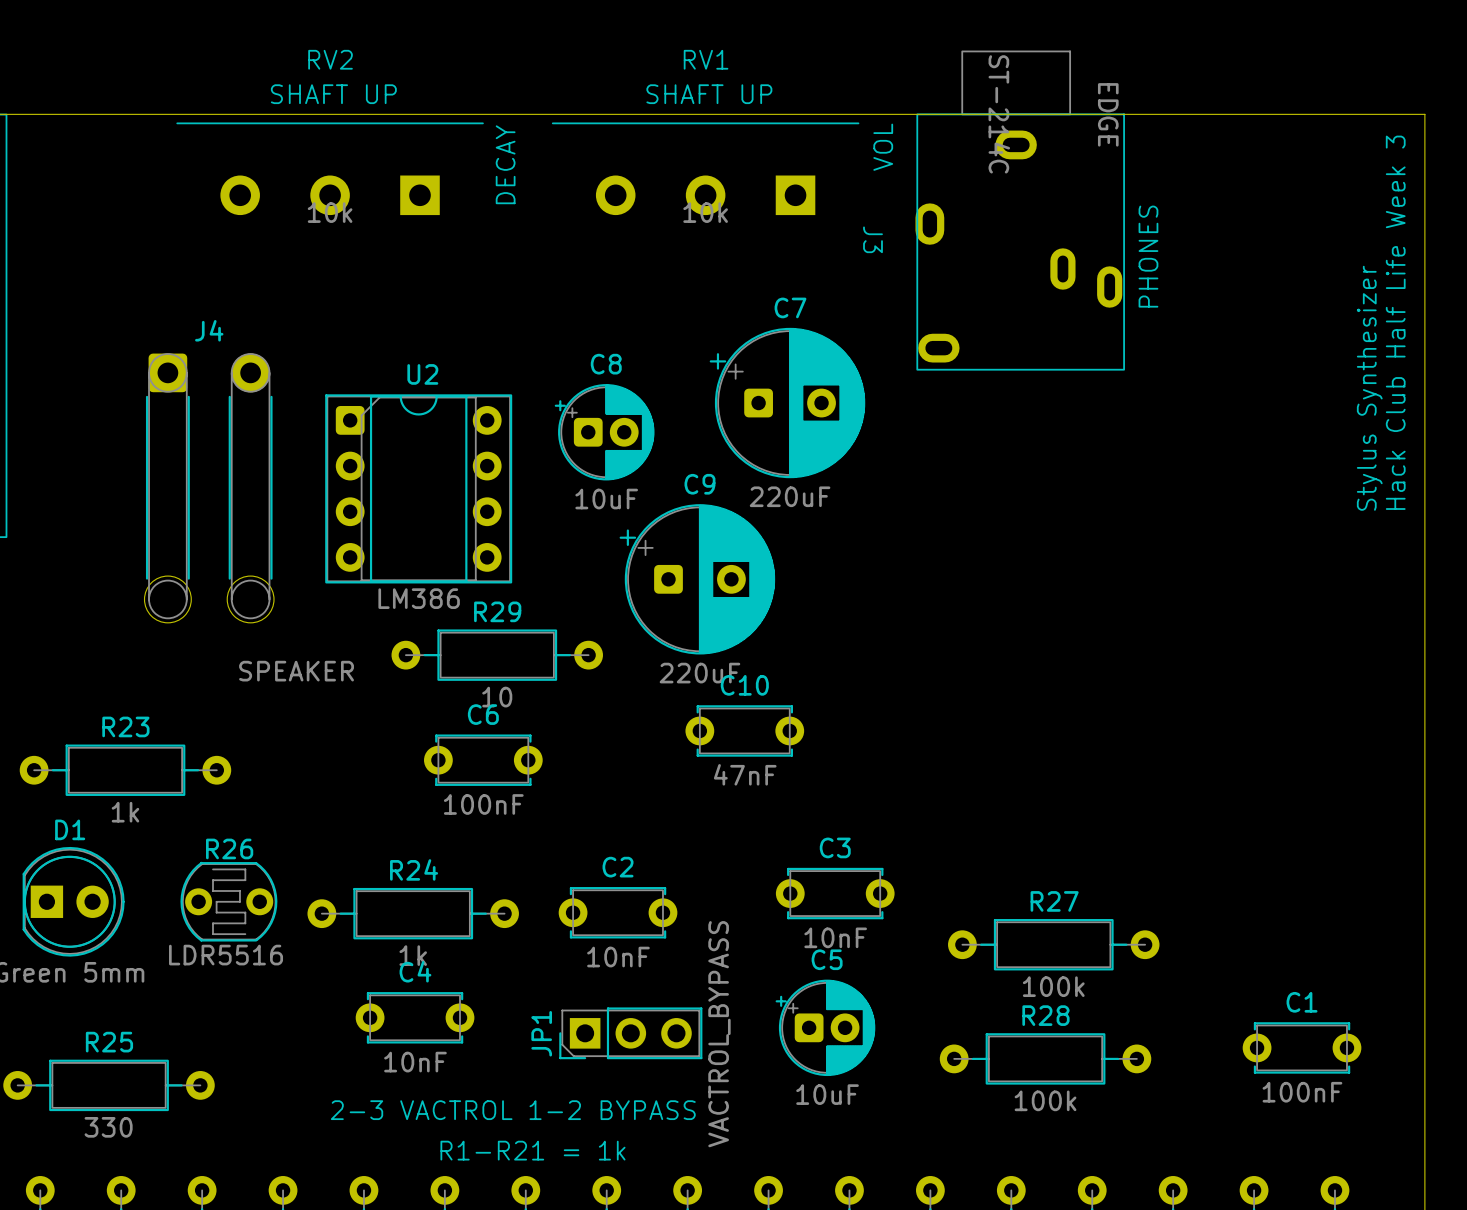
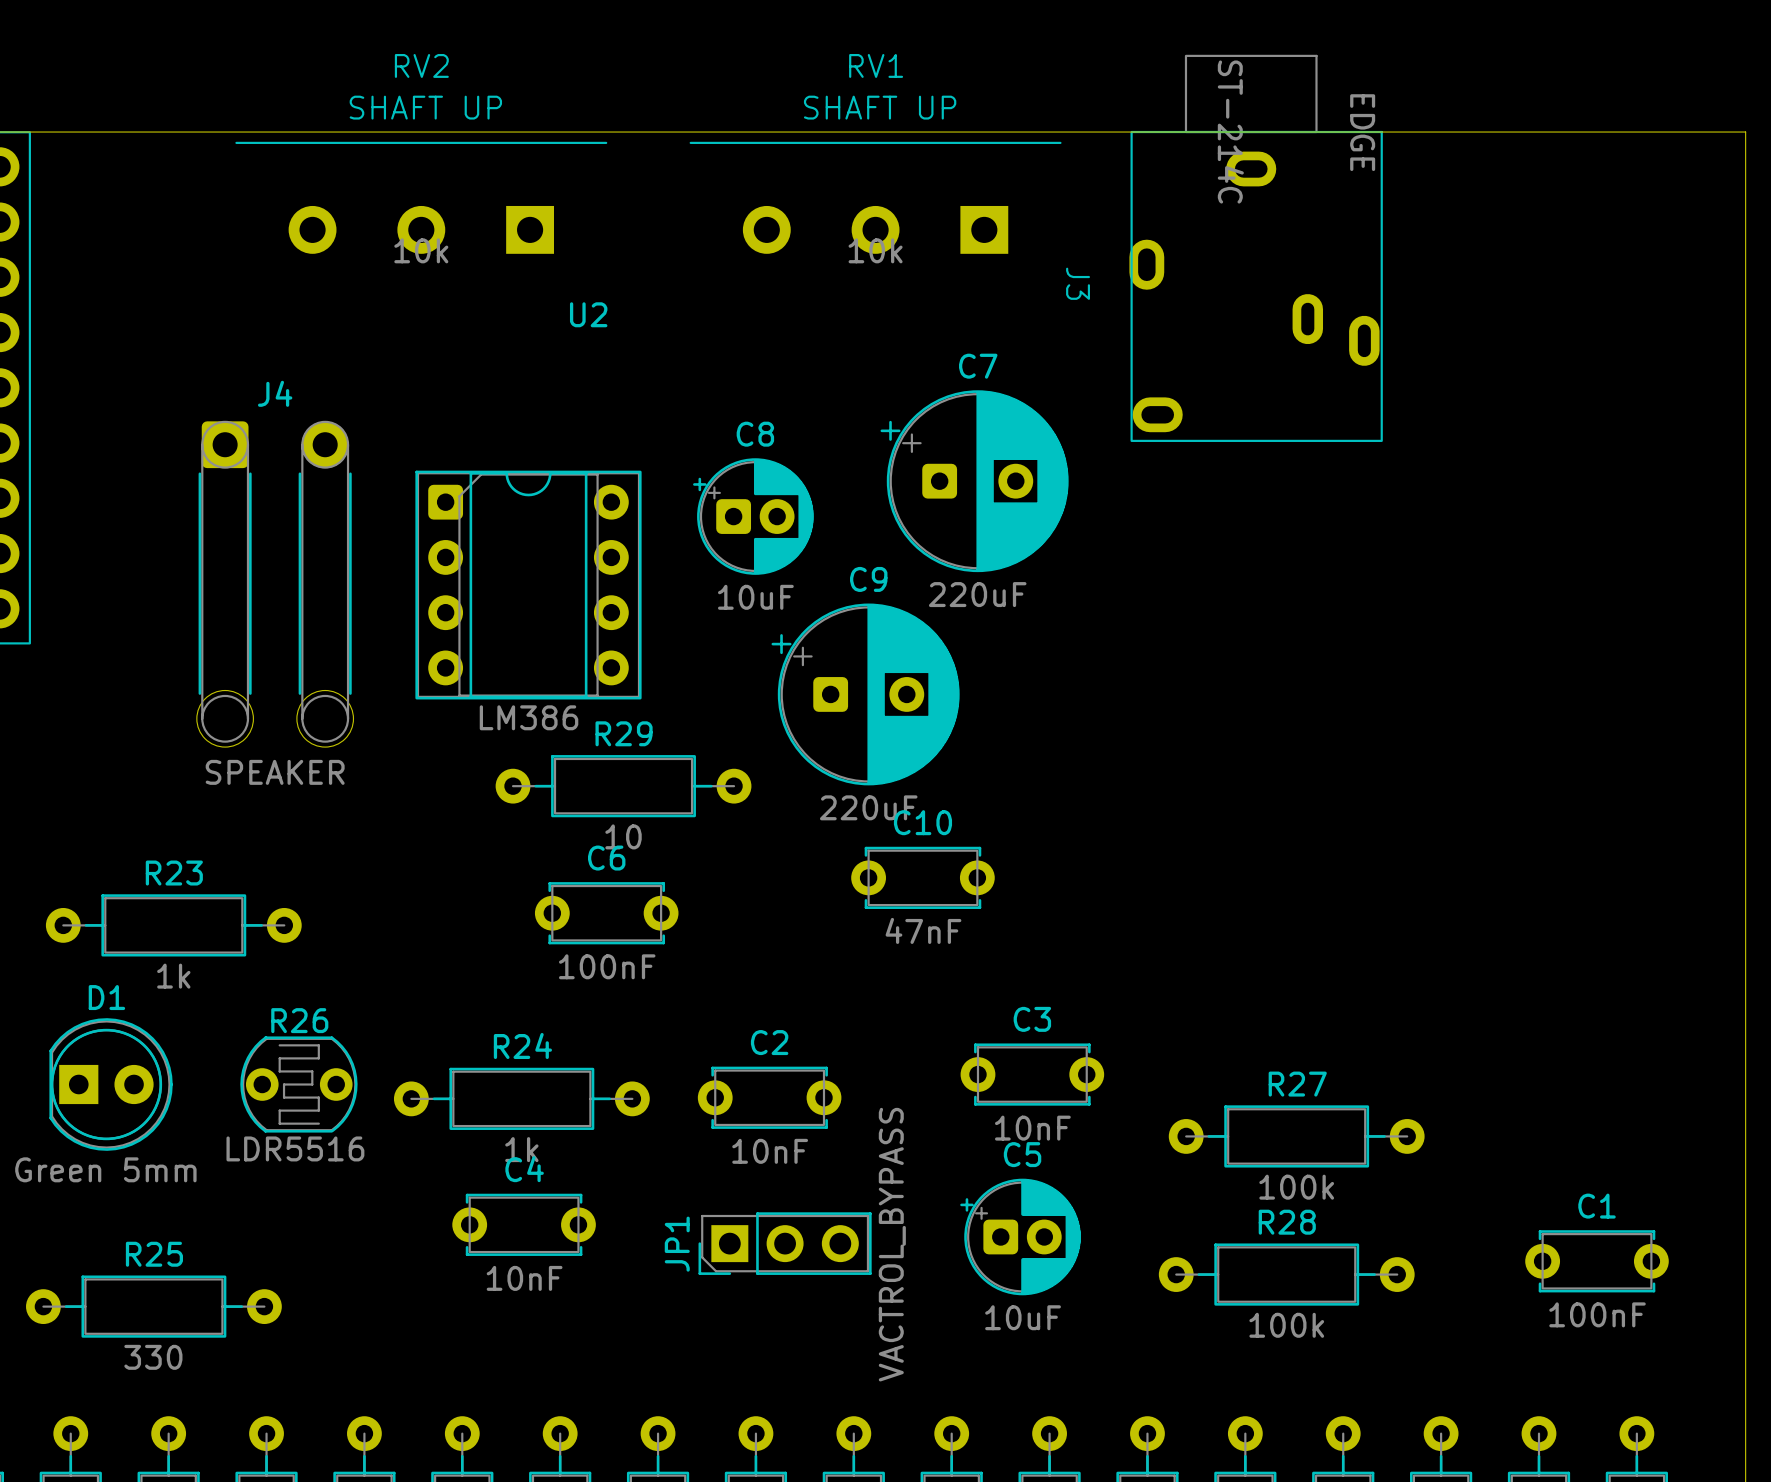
text: VOL (883, 147) -> none
text: DECAY (505, 164) -> none
text: PHONES (1148, 256) -> none
text: Hack Club Half Life Week 3 (1395, 322) -> none
U2 name position: U2 (422, 374) -> U2 (588, 314)
text: Stylus Synthesizer (1369, 388) -> none
J4 value position: SPEAKER (296, 671) -> SPEAKER (275, 772)
text: 2-3 VACTROL 1-2 BYPASS (513, 1110) -> none
text: R1-R21 = 1k (532, 1150) -> none

